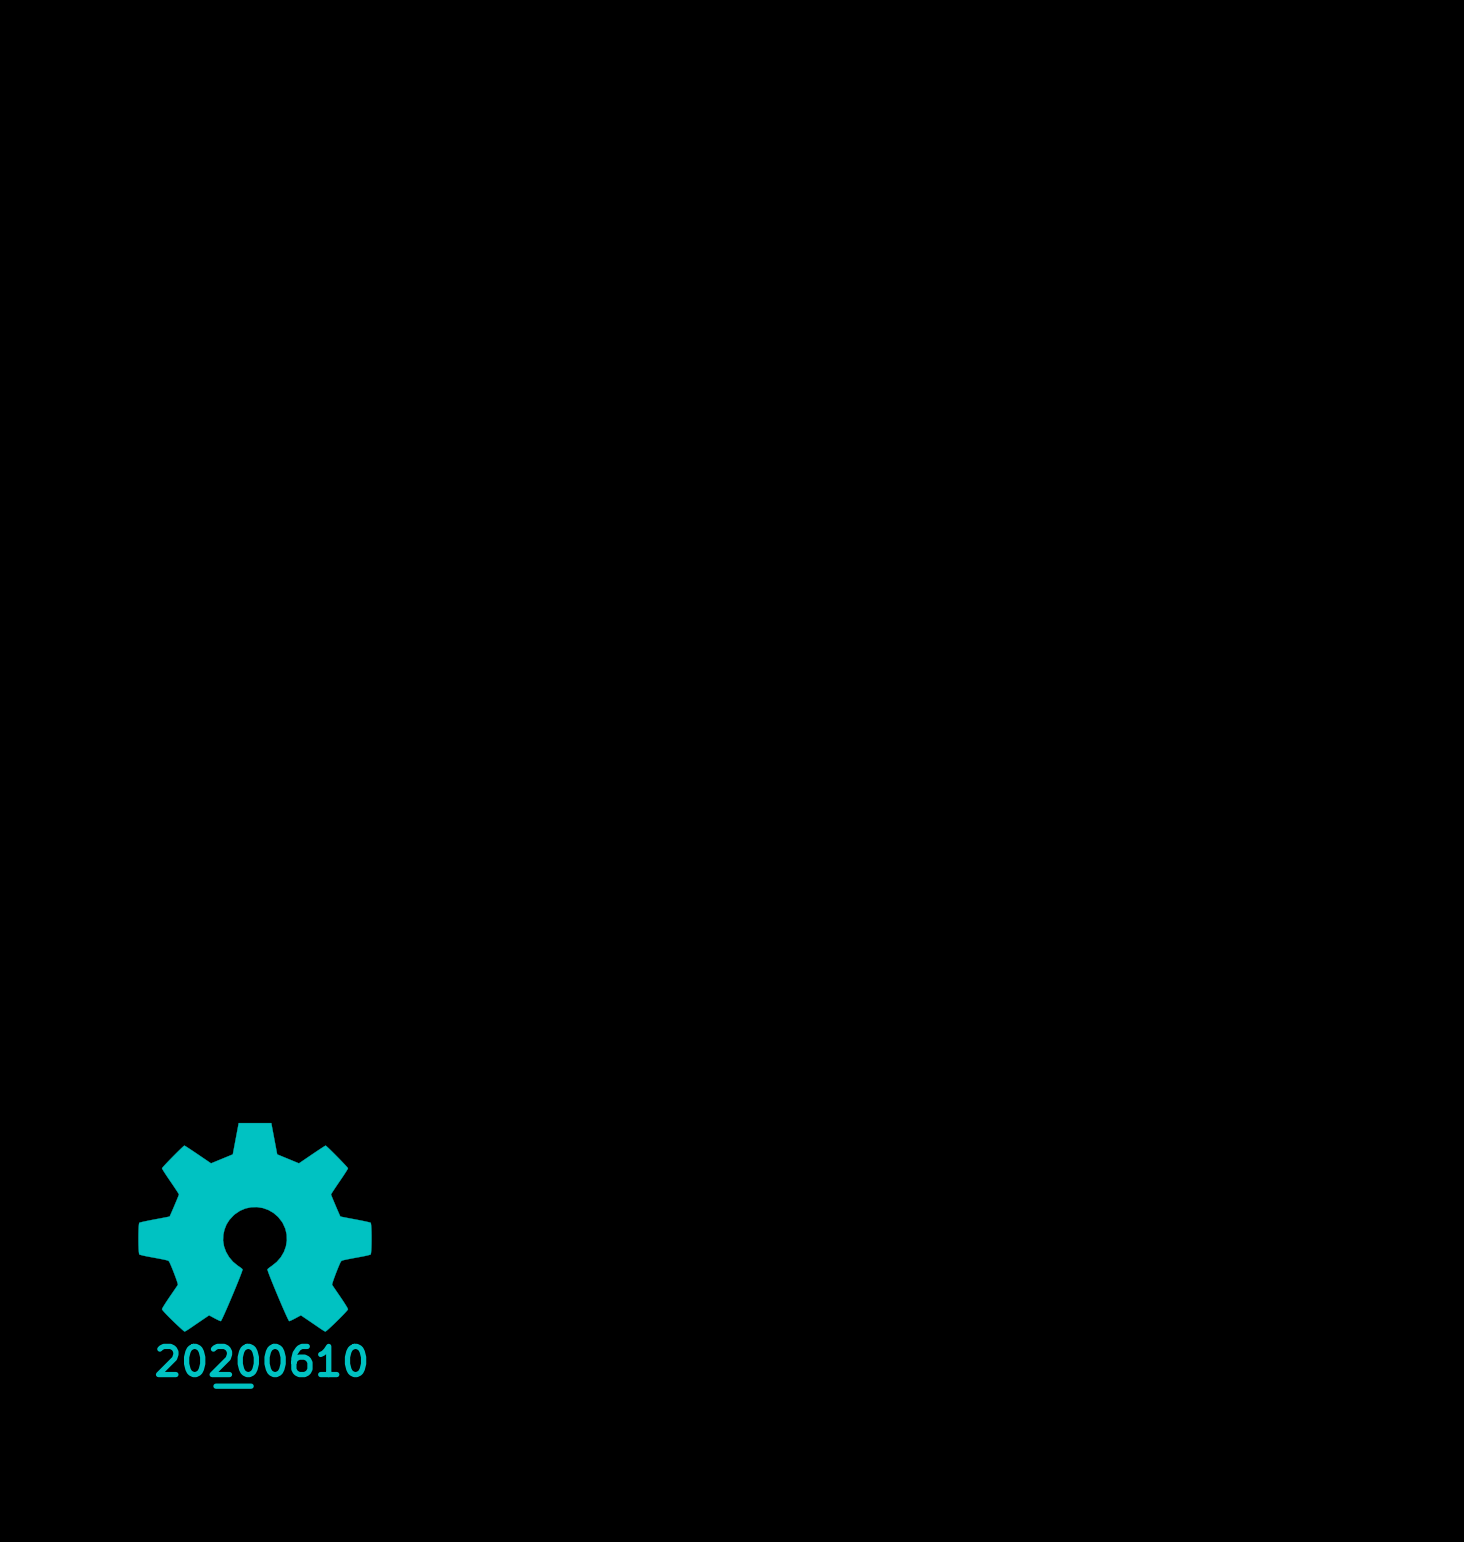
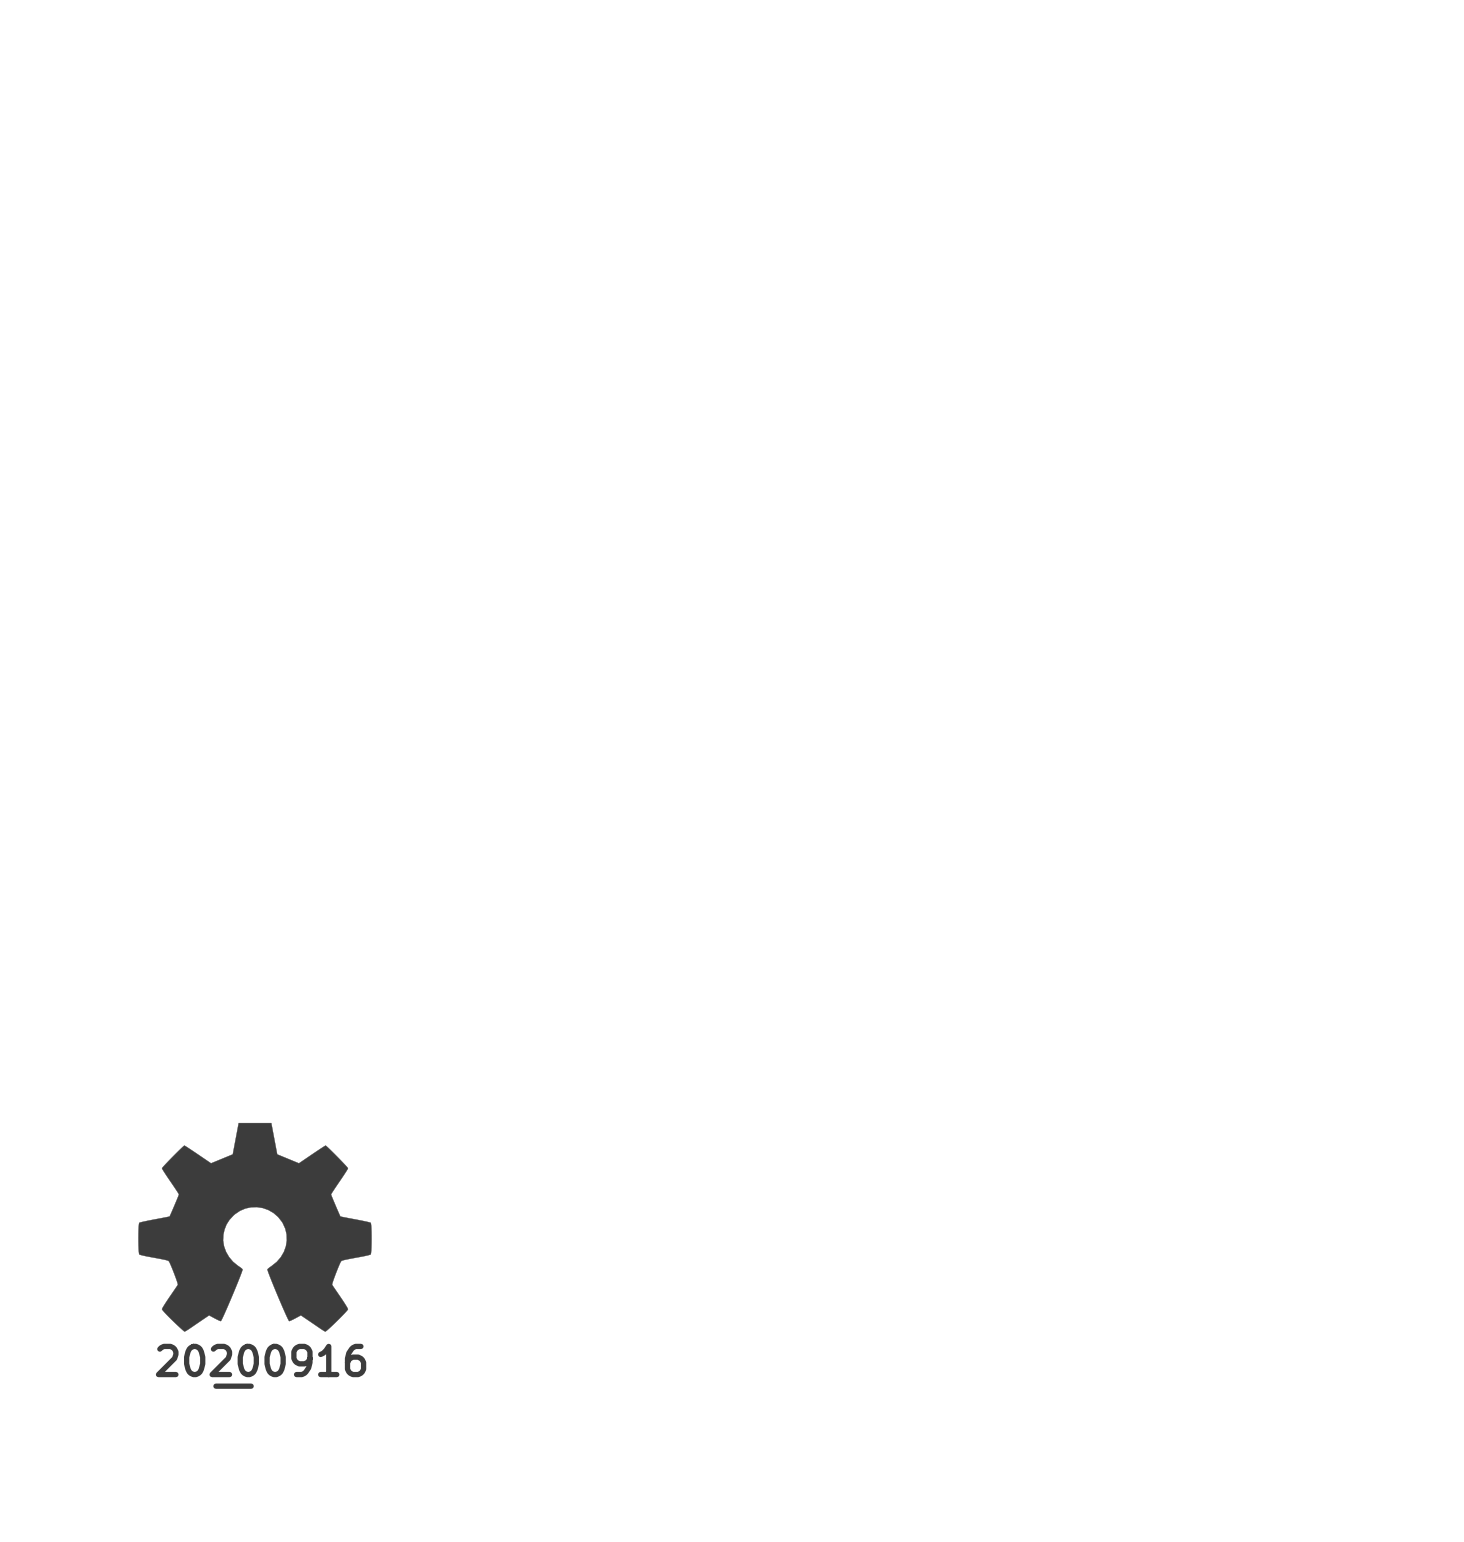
drawing shape: [155, 1343, 367, 1389] -> [155, 1343, 367, 1389]

